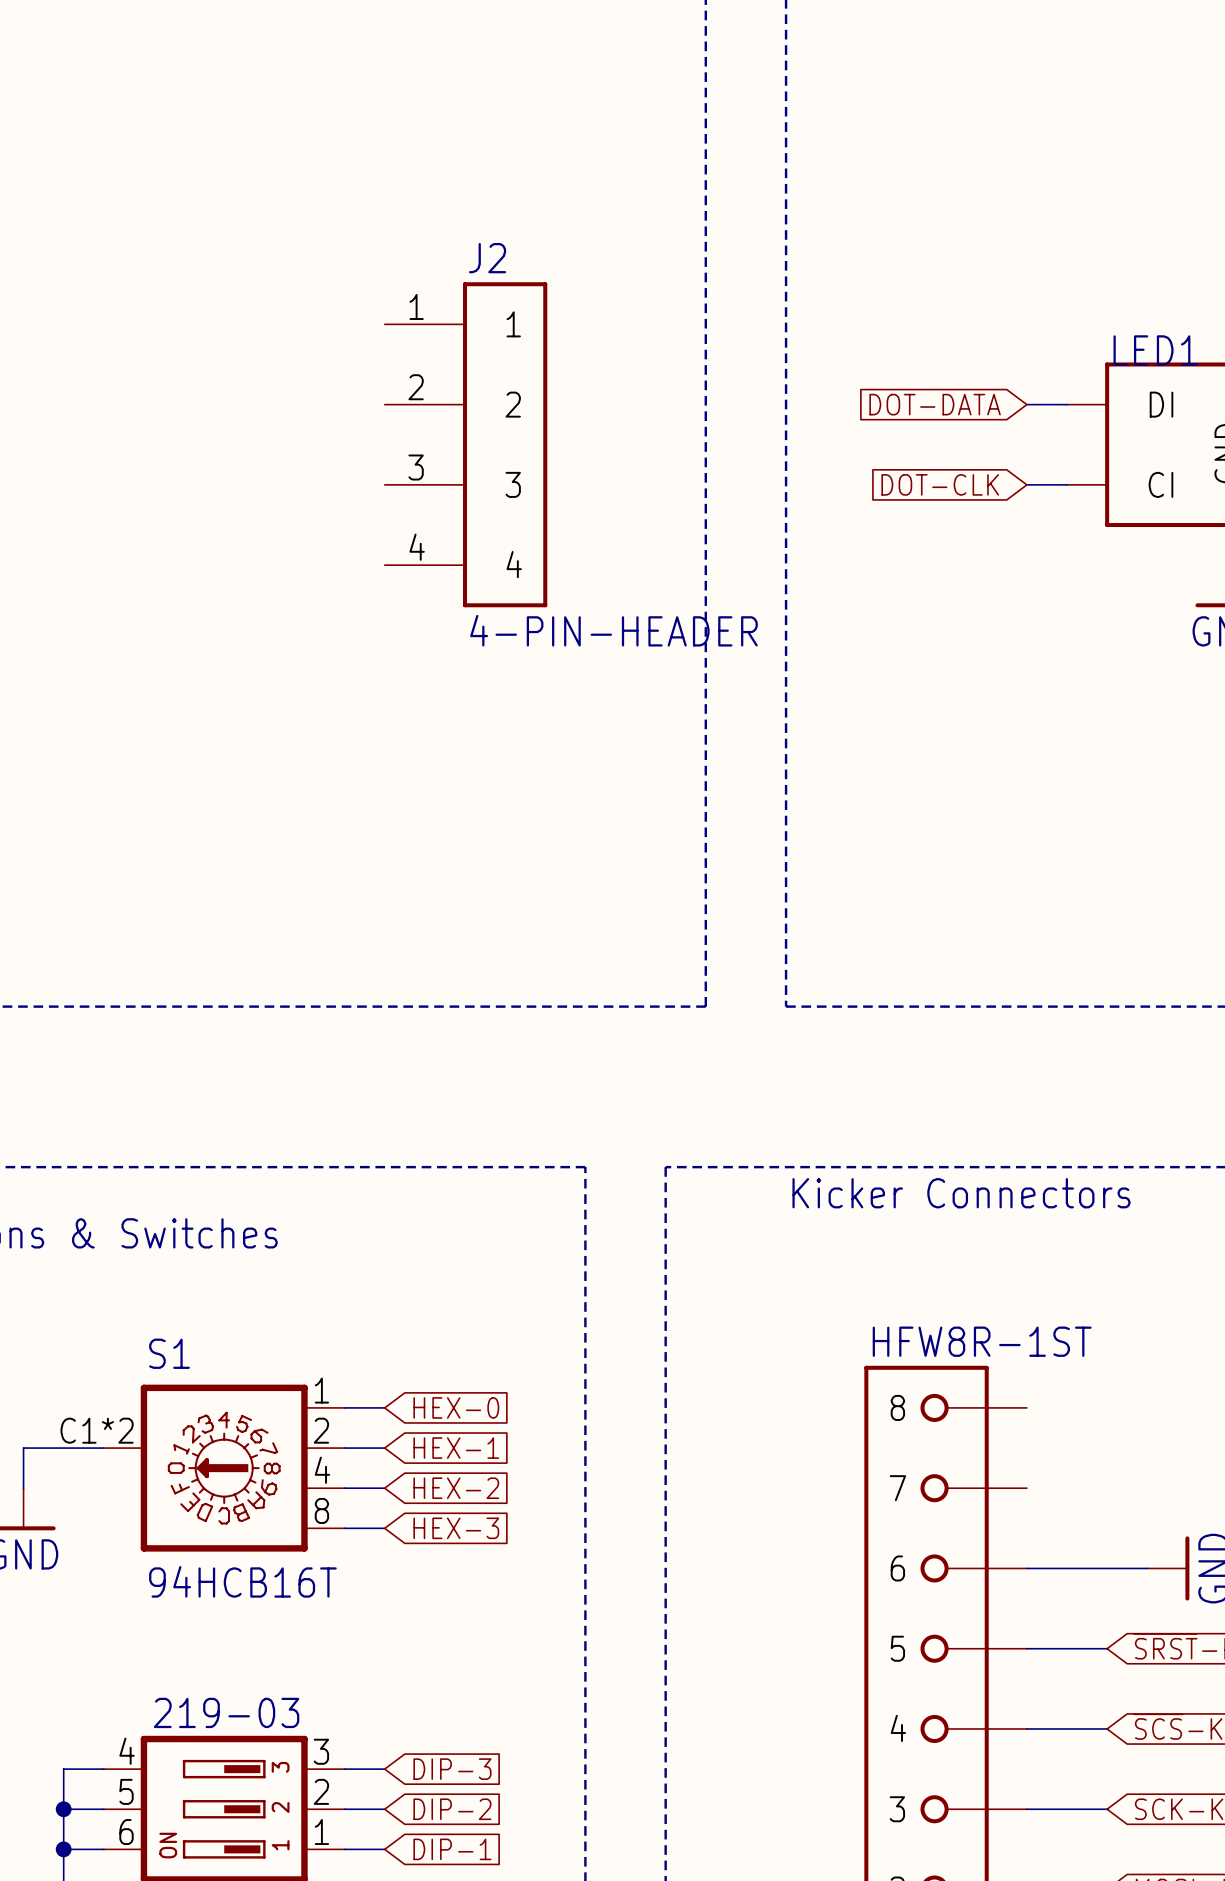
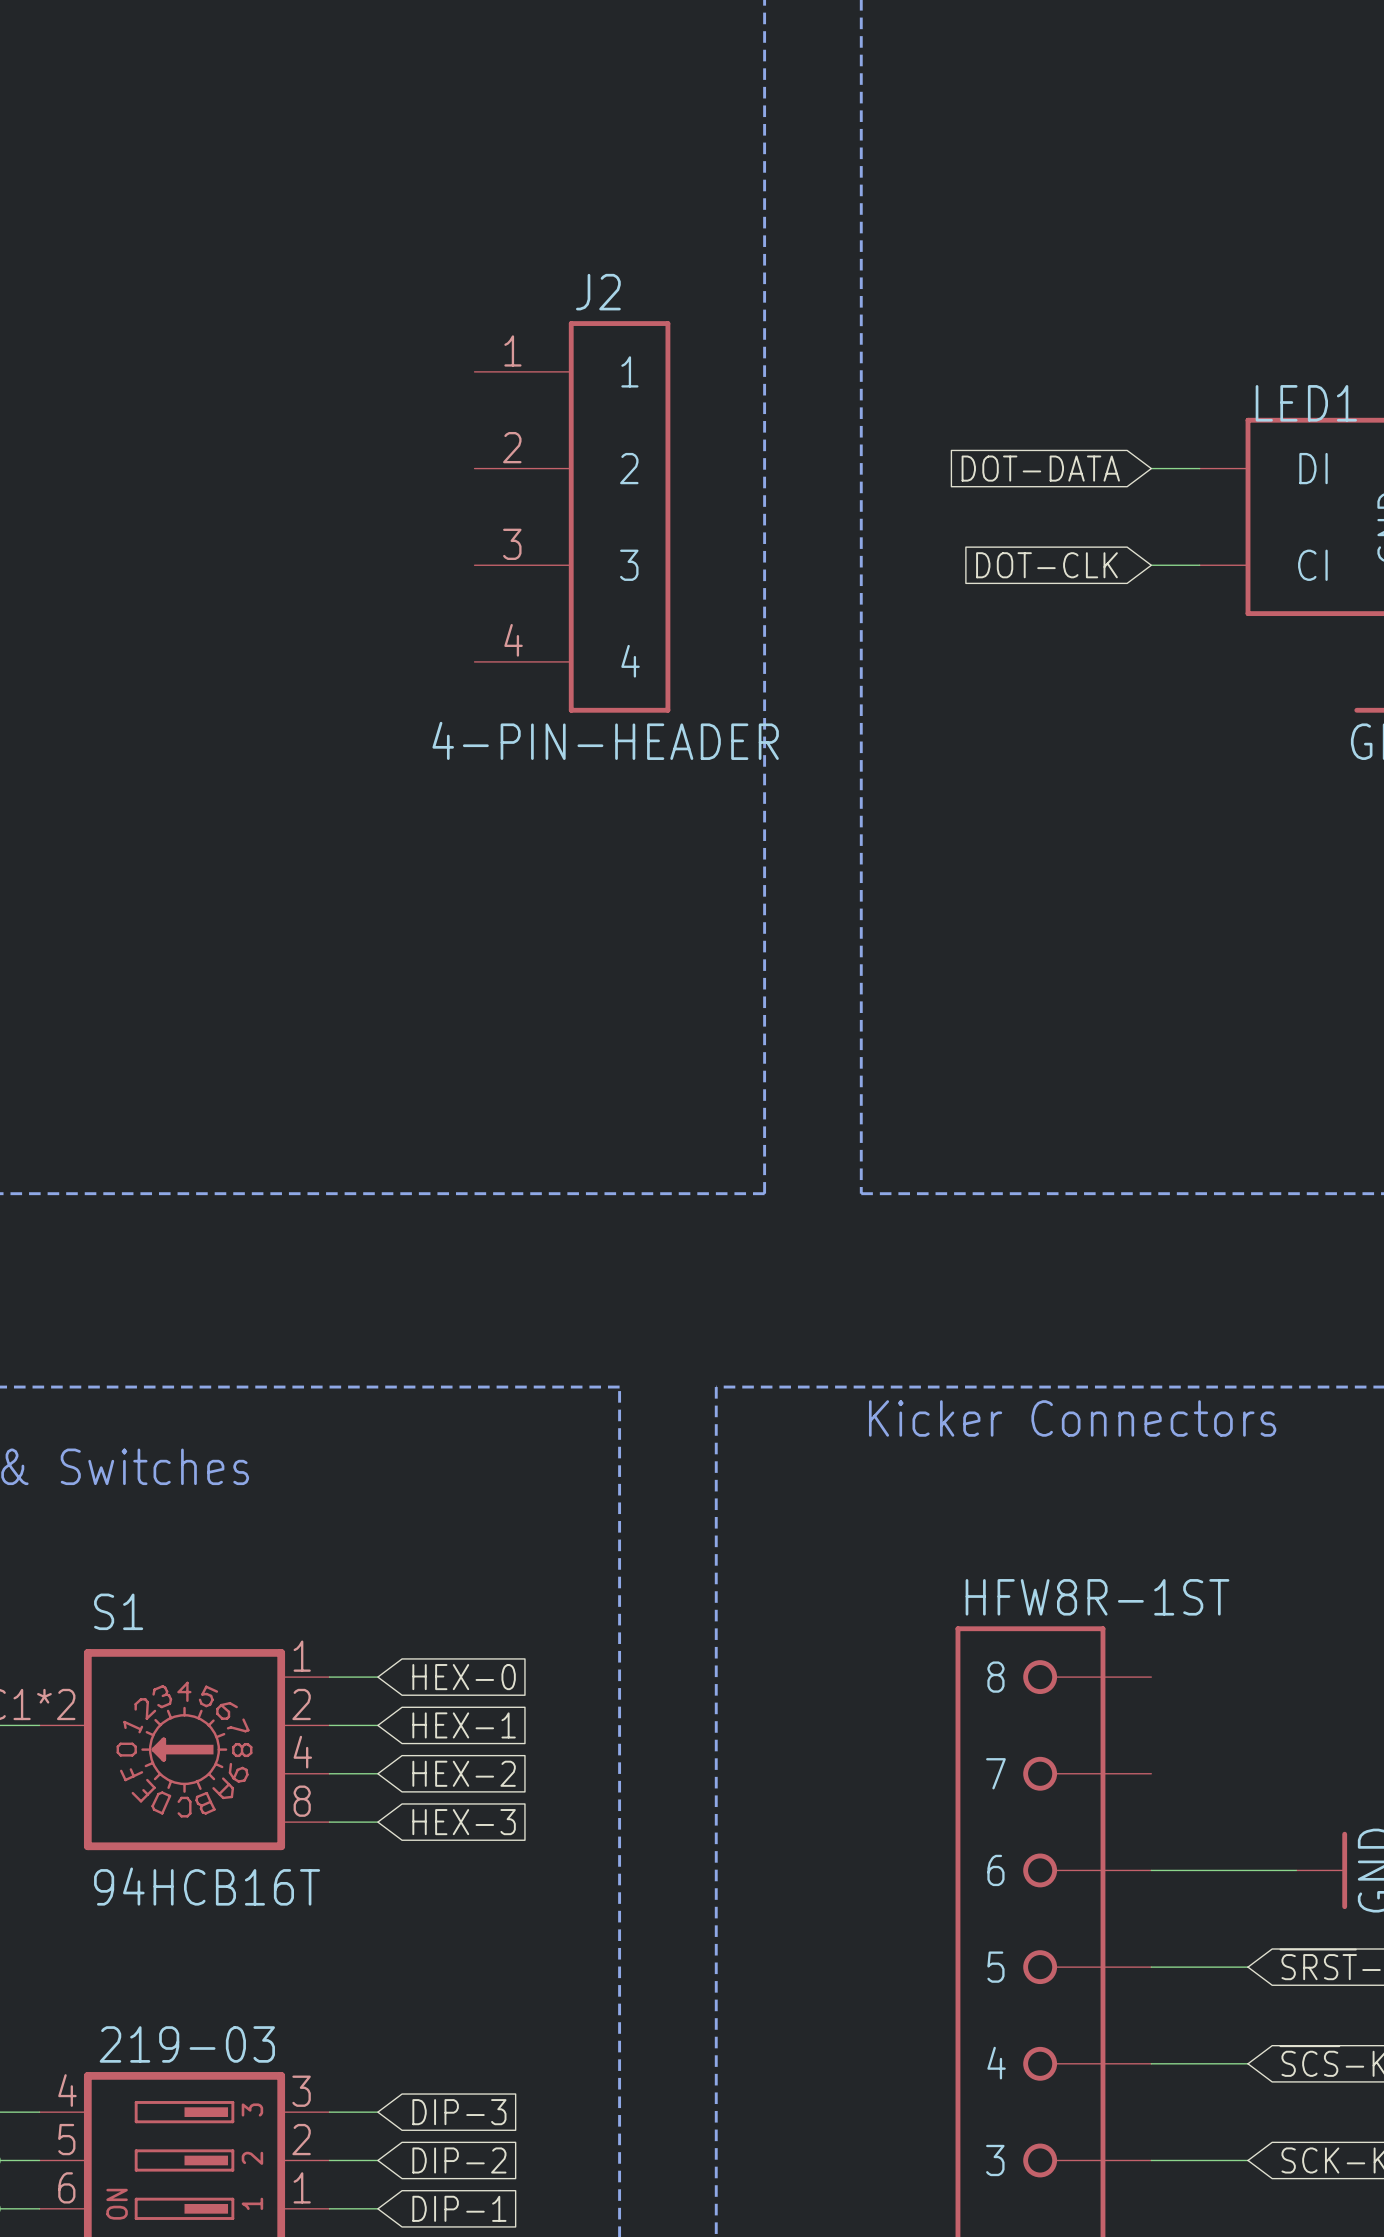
J2 position: (466, 444) -> (572, 516)
J2 value position: 4-PIN-HEADER (613, 630) -> 4-PIN-HEADER (605, 740)

